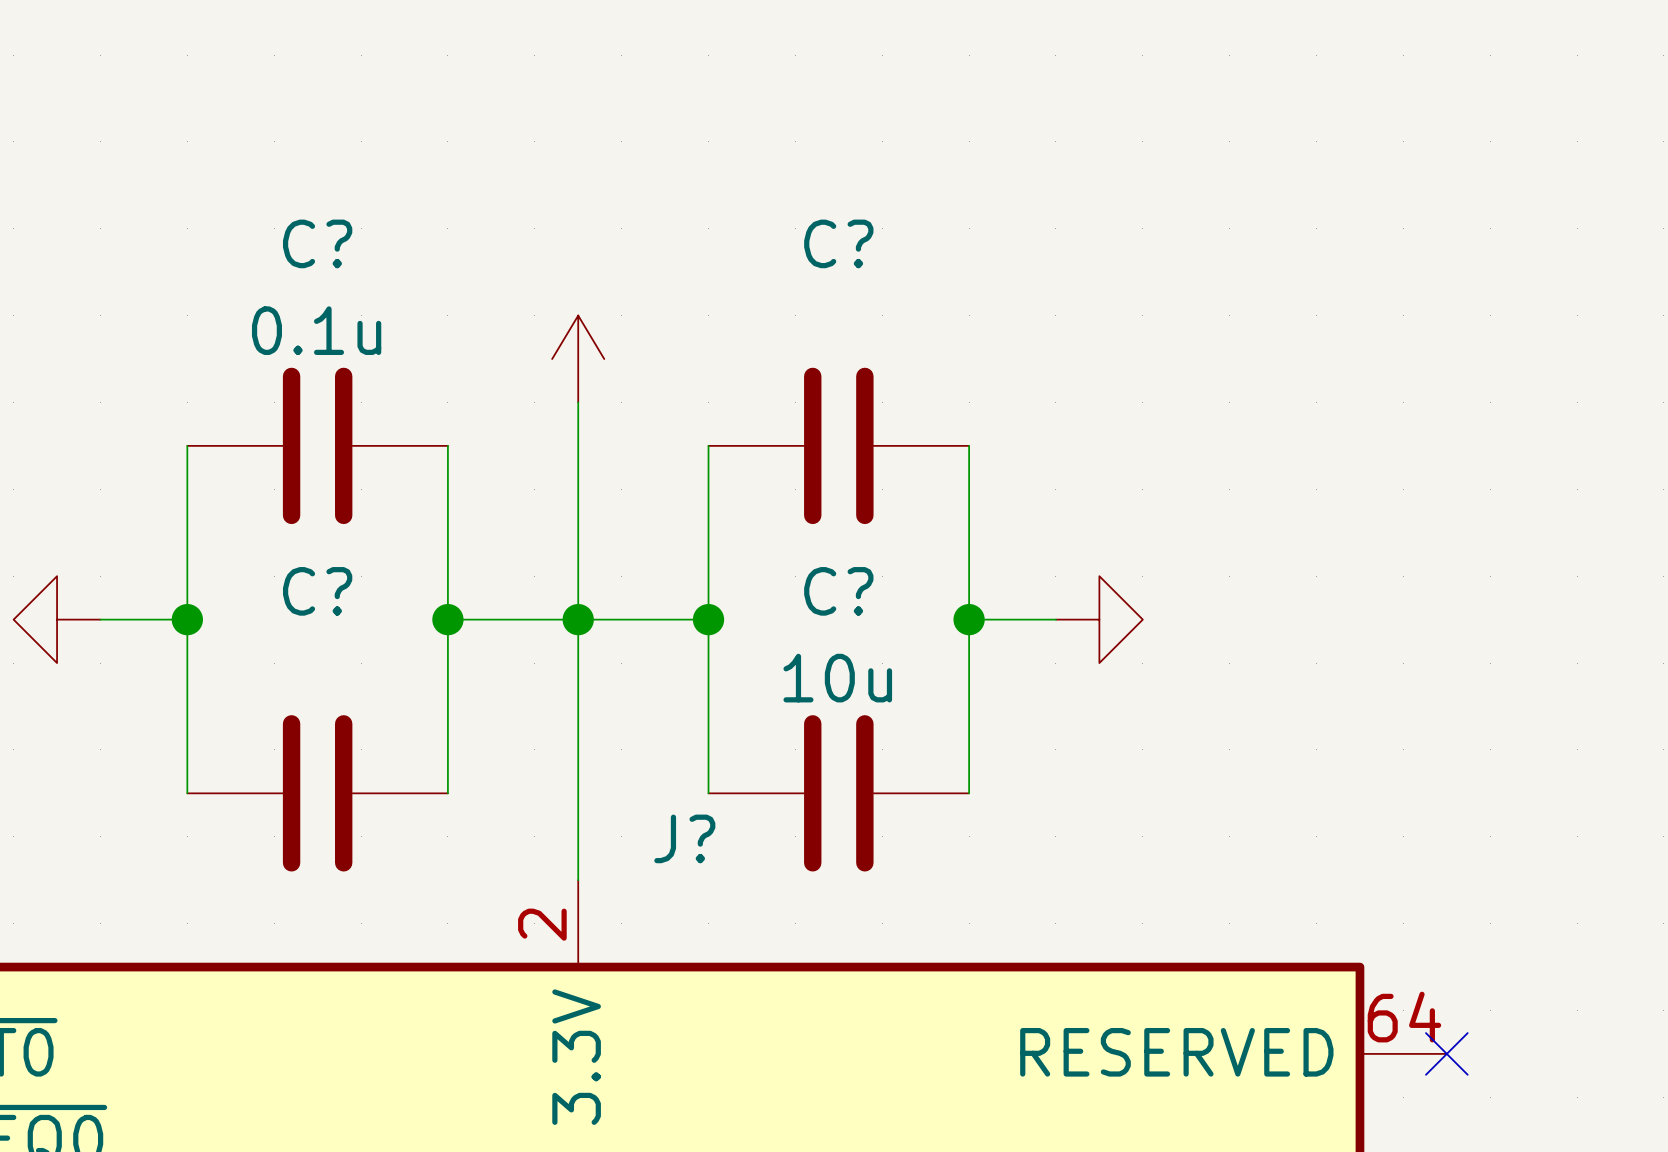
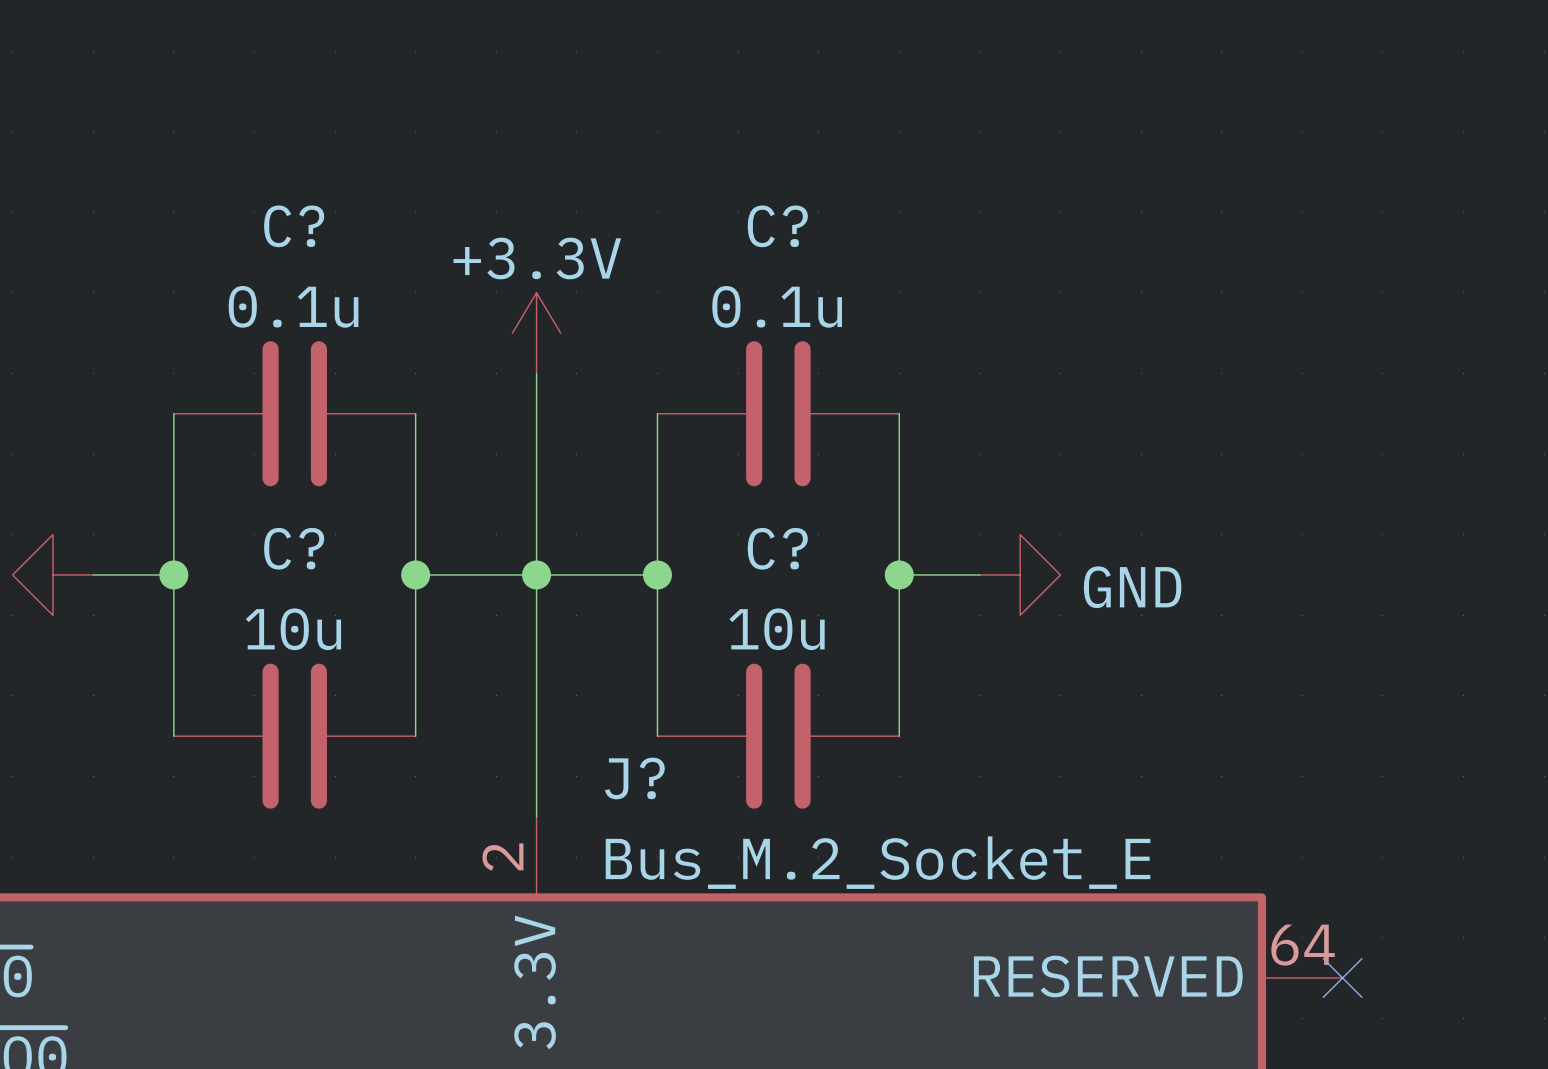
power symbol text: none -> +3.3V (537, 258)
C? value: none -> 0.1u (777, 306)
power symbol text: none -> GND (1132, 587)
C? value: none -> 10u (293, 629)
J? value: none -> Bus_M.2_Socket_E (878, 862)

